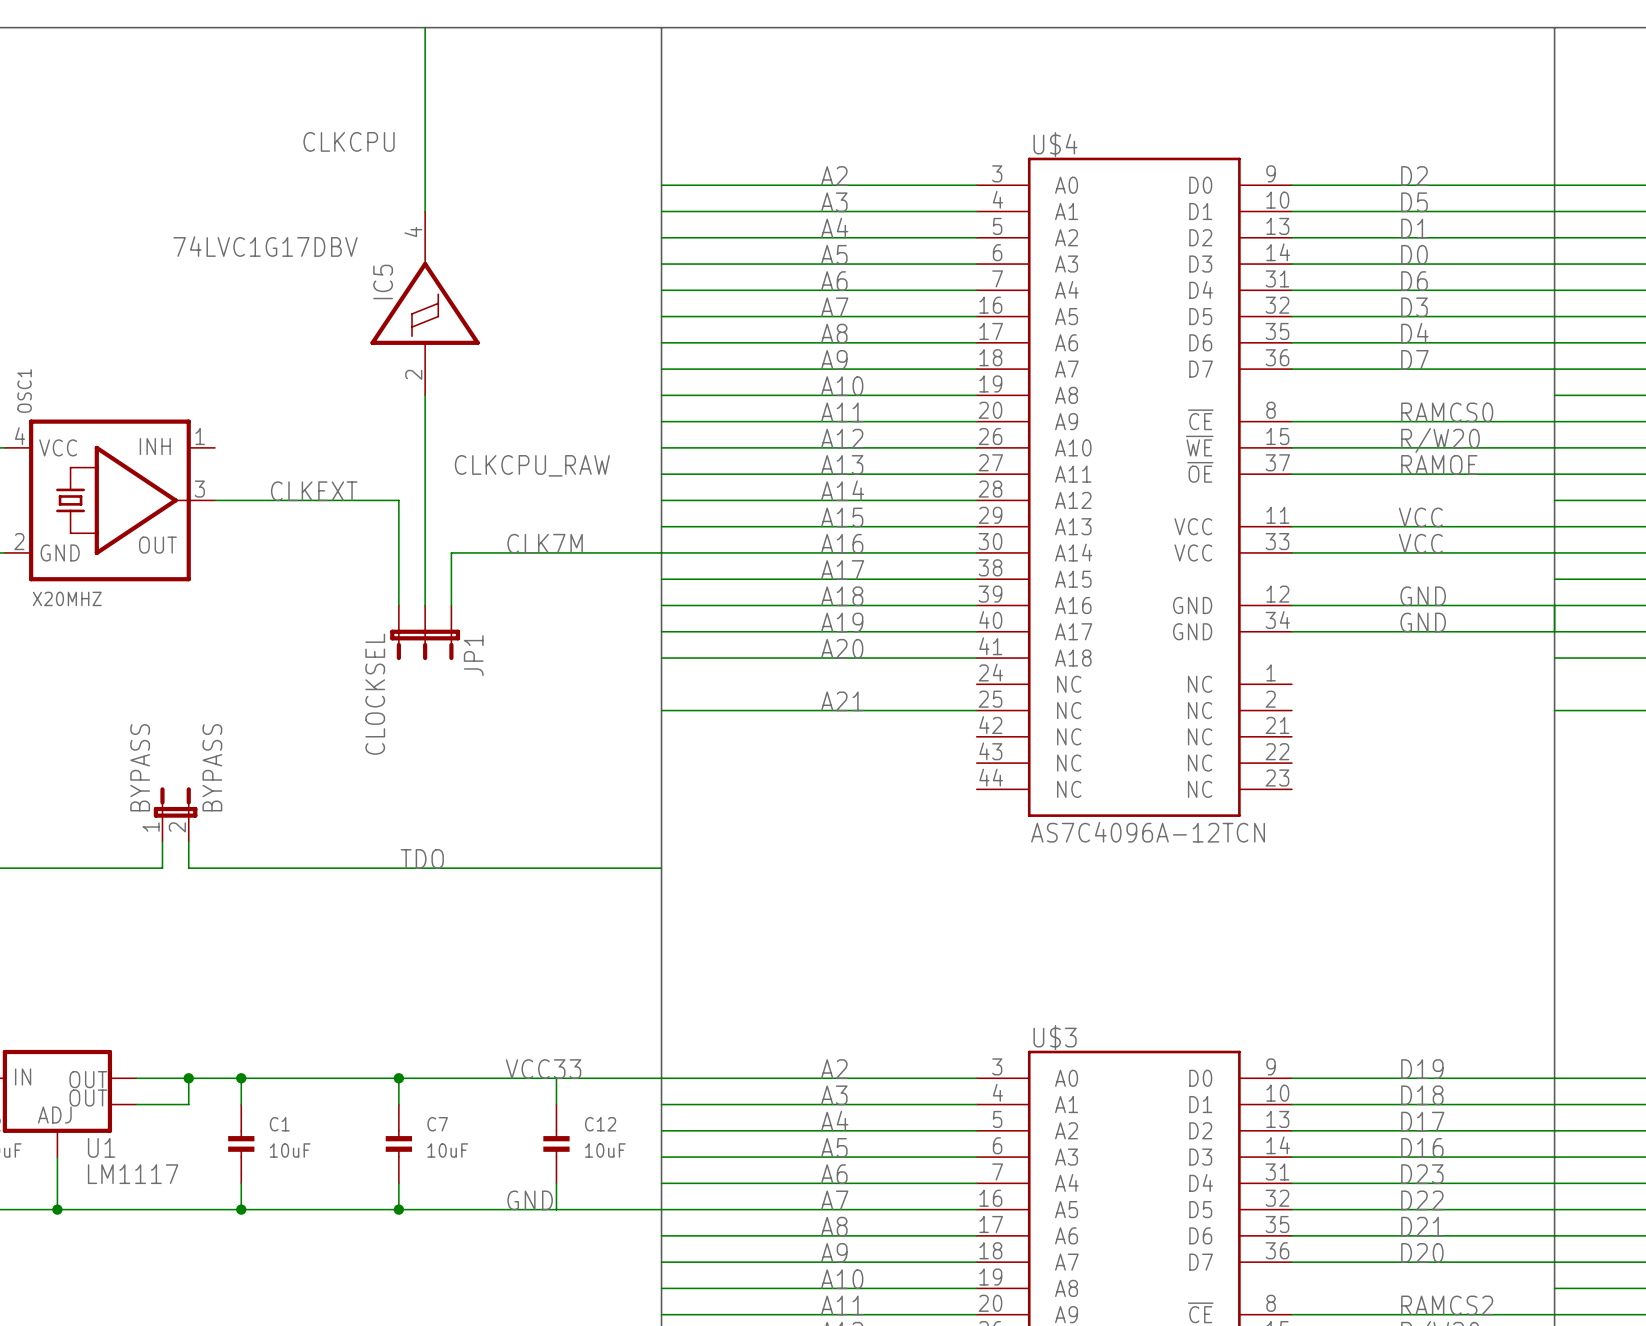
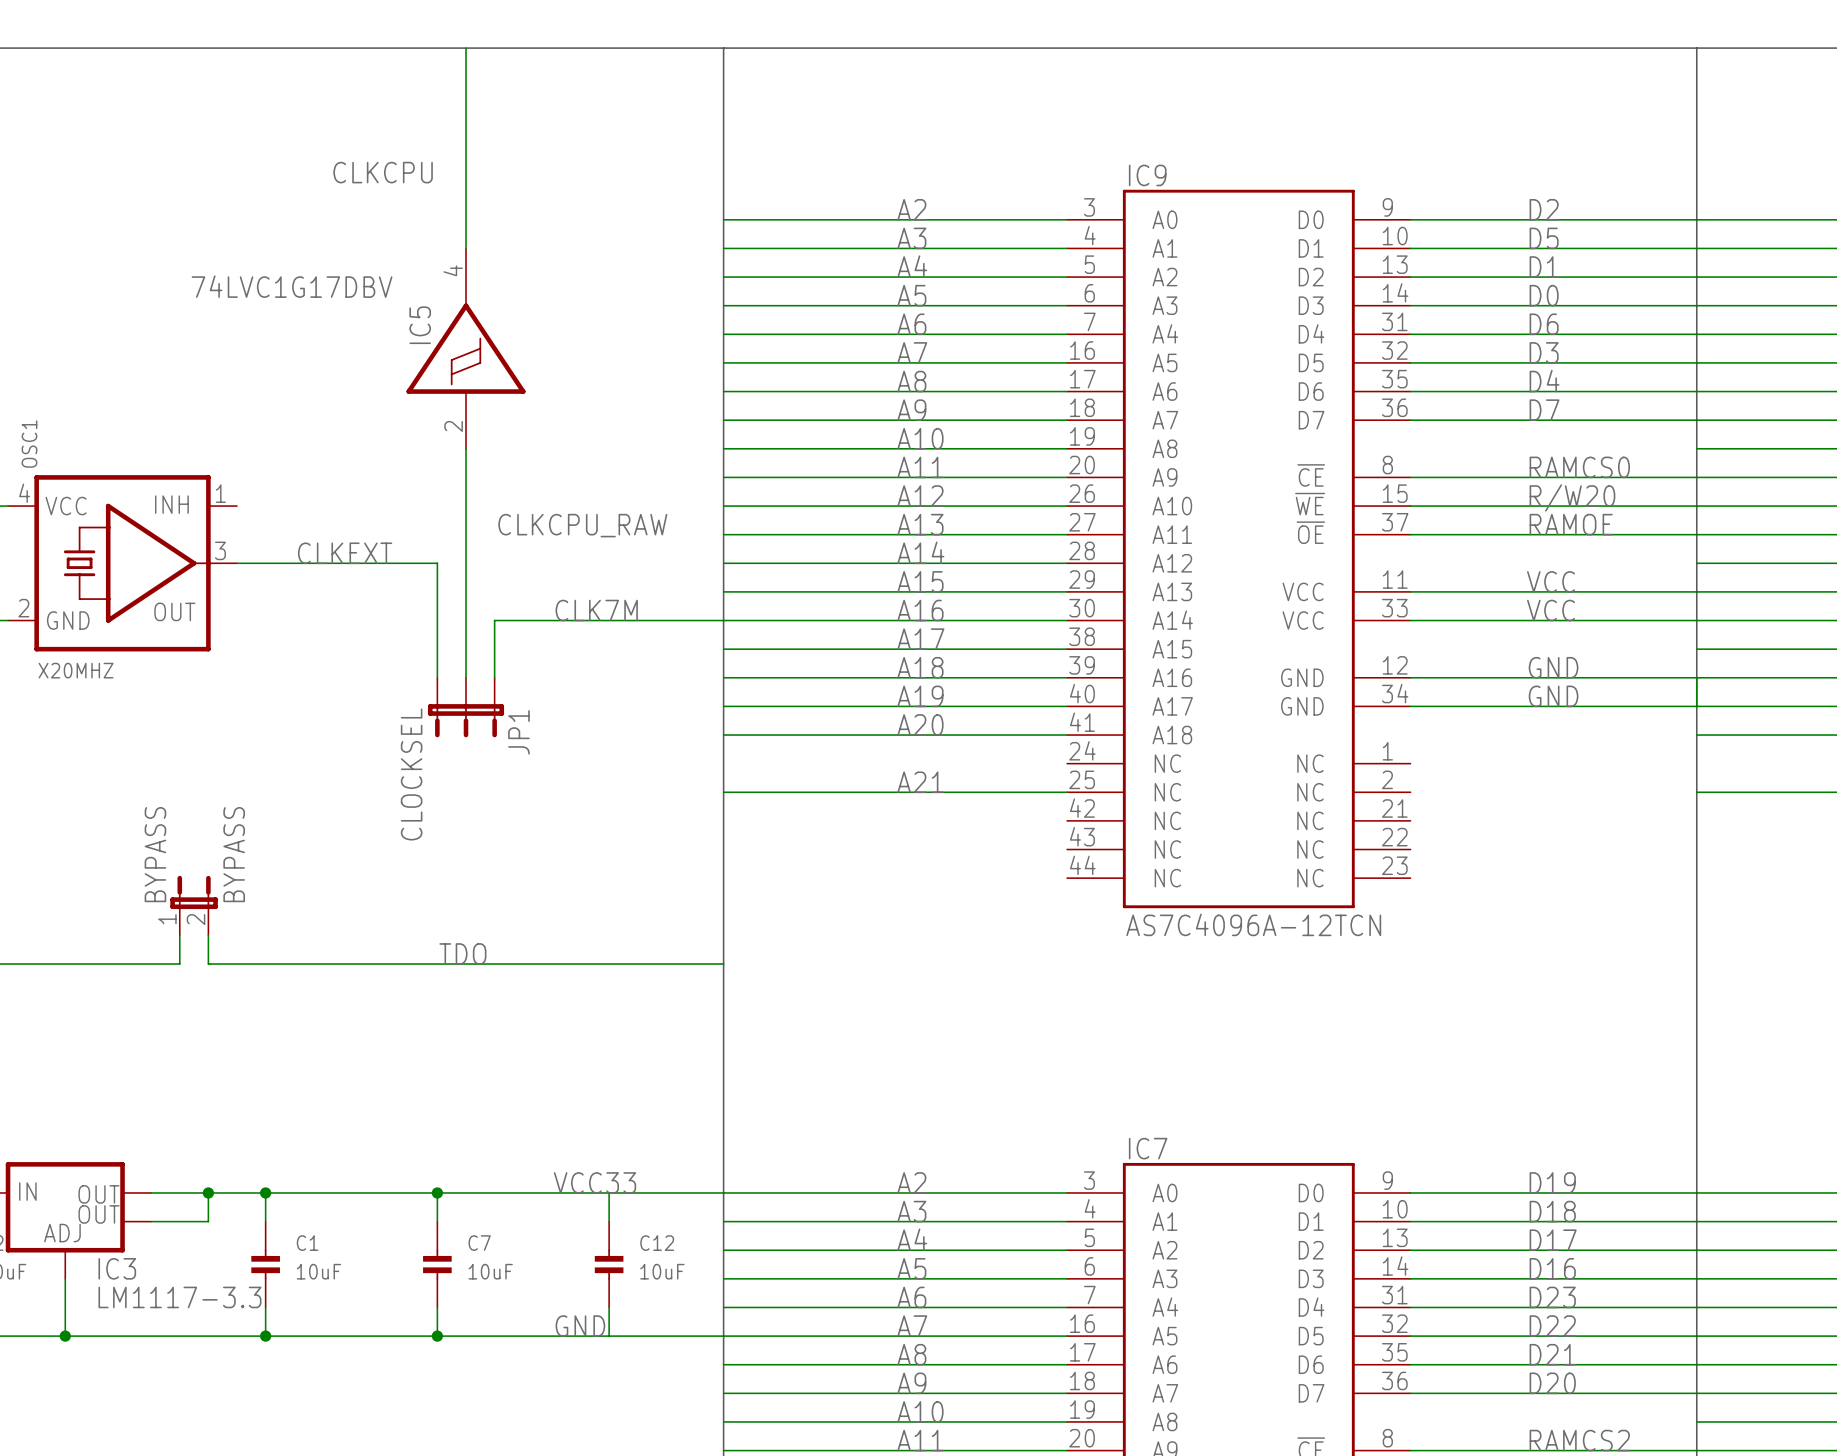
U$4 name: U$4 (1055, 144) -> IC9 (1147, 175)
U$3 name: U$3 (1055, 1037) -> IC7 (1148, 1148)
U1 name: U1 (101, 1147) -> IC3 (117, 1268)
U1 value: LM1117 (133, 1174) -> LM1117-3.3 (179, 1297)

